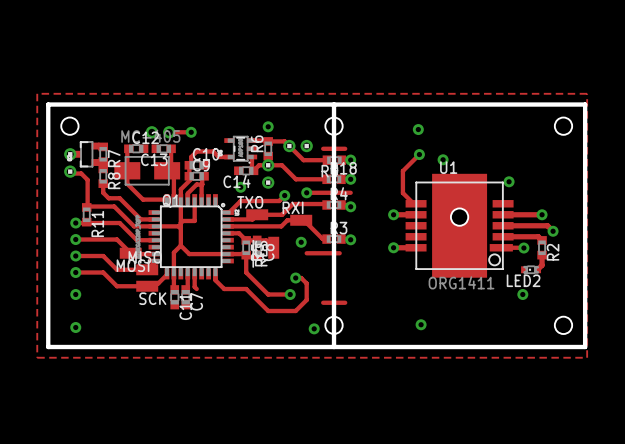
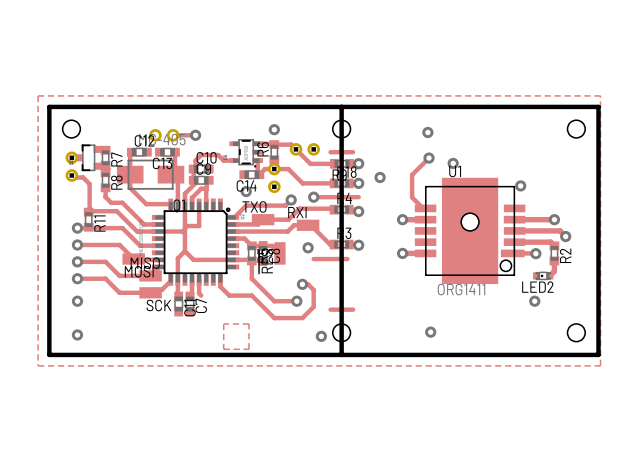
via: none -> (380, 177)
zone outline: none -> (223, 323) (249, 323) (249, 349) (223, 349) (223, 323)

